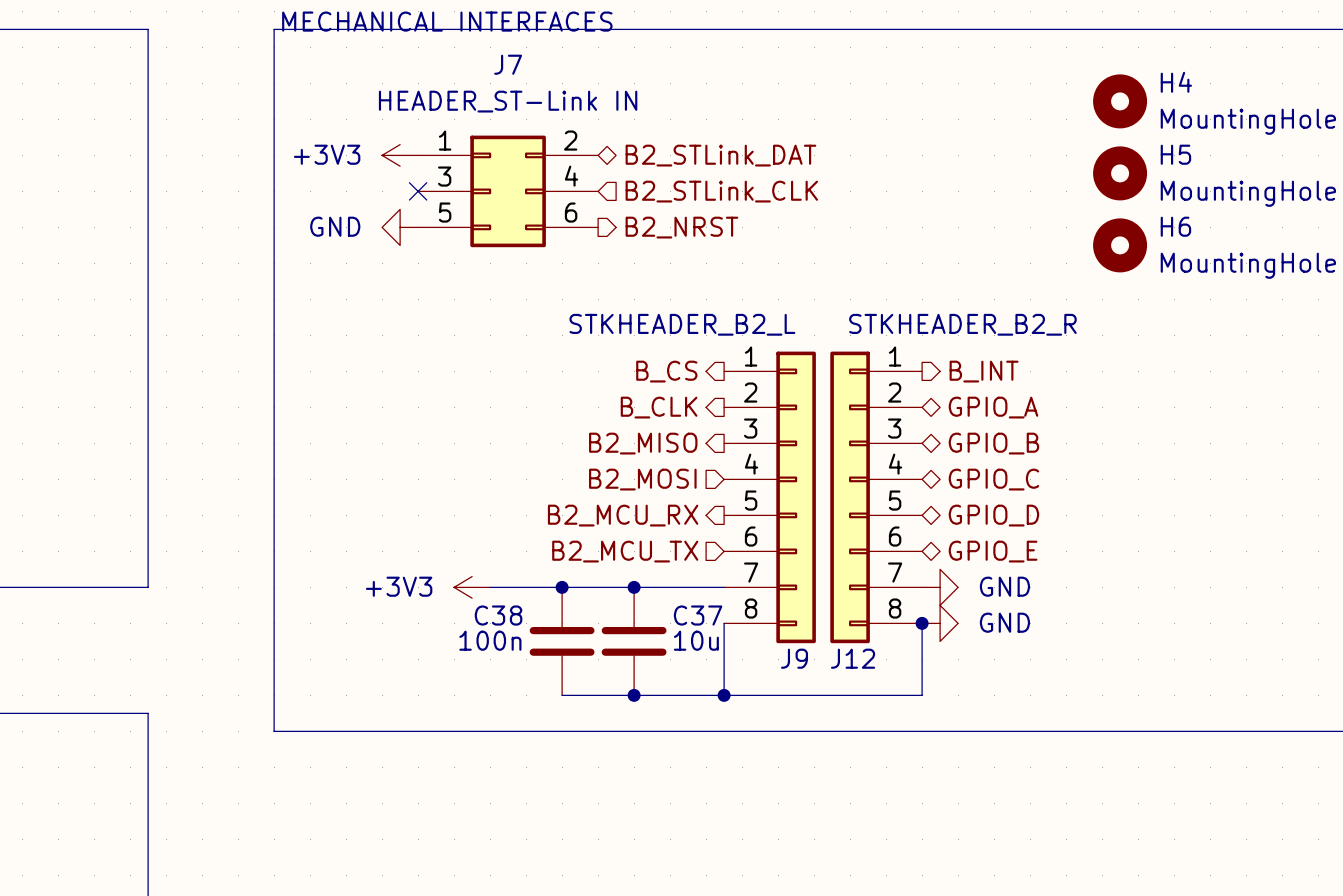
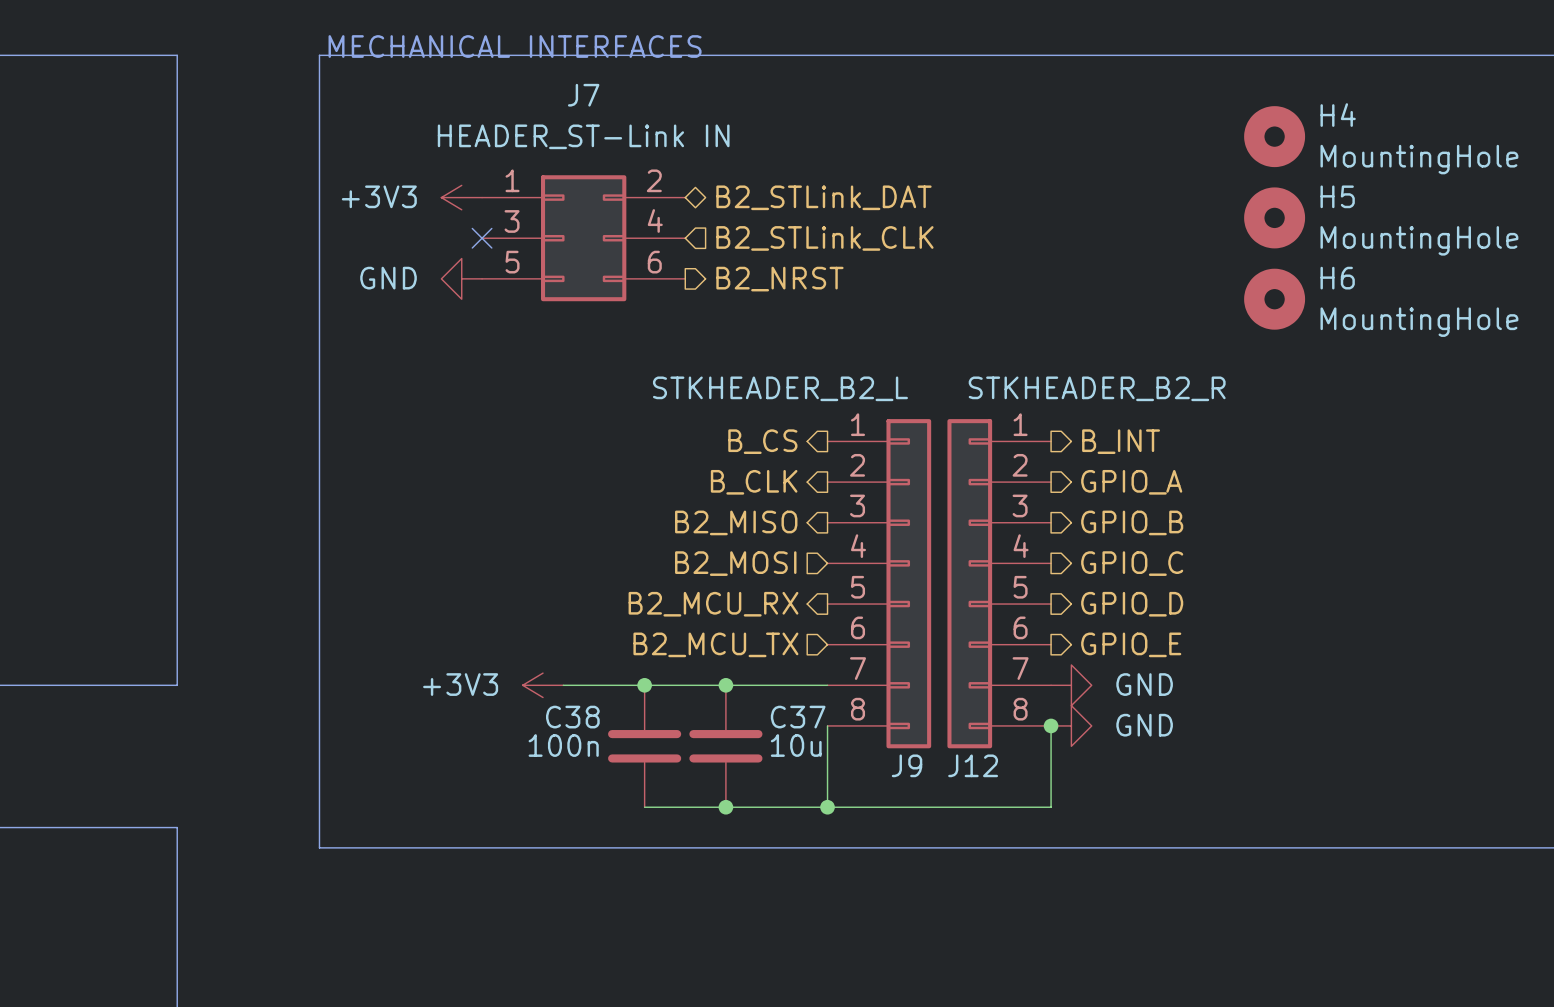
hierarchical label shape: bidirectional (993, 407) -> output (1131, 482)
hierarchical label shape: bidirectional (993, 443) -> output (1132, 522)
hierarchical label shape: bidirectional (993, 479) -> output (1132, 563)
hierarchical label shape: bidirectional (993, 515) -> output (1132, 604)
hierarchical label shape: bidirectional (993, 551) -> output (1131, 644)

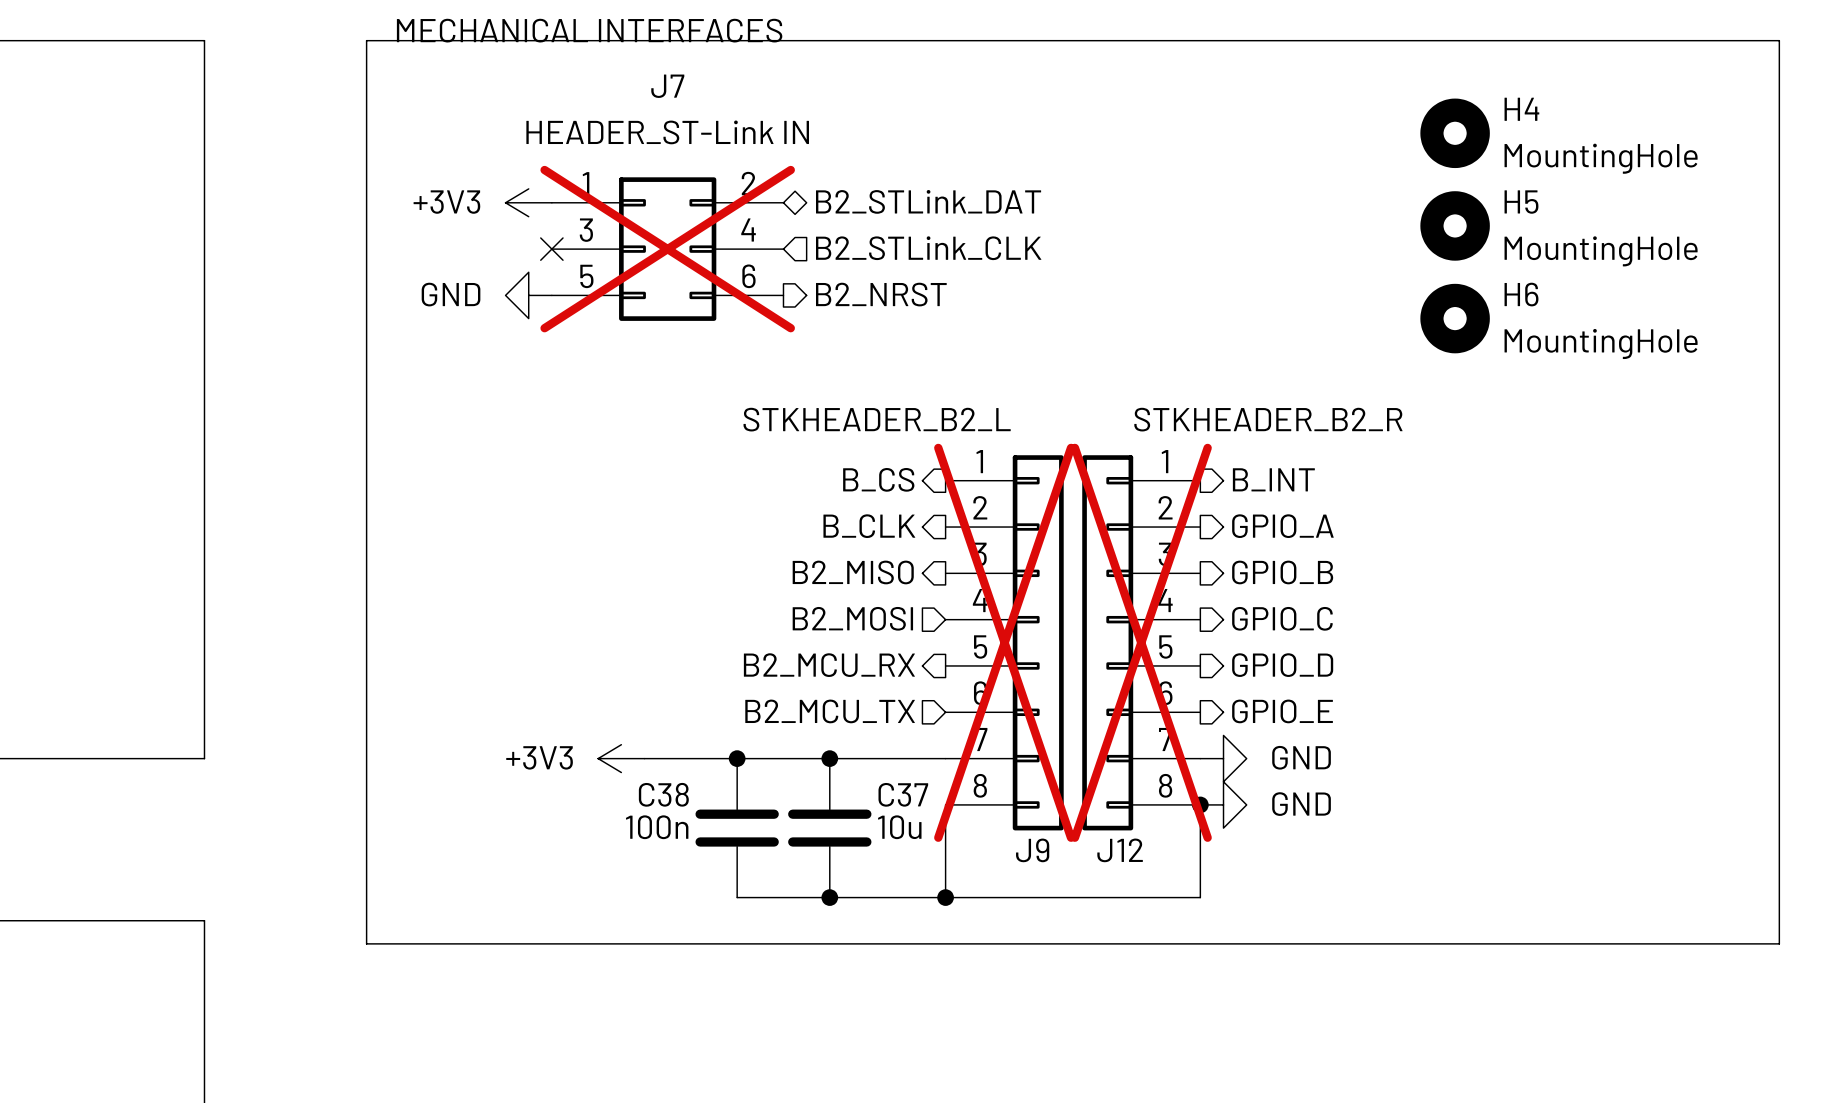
J7 do-not-place cross: none -> (667, 249)
J9 do-not-place cross: none -> (1004, 642)
J12 do-not-place cross: none -> (1141, 642)

